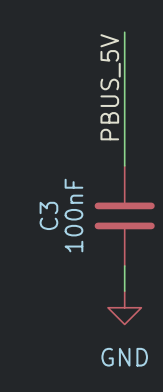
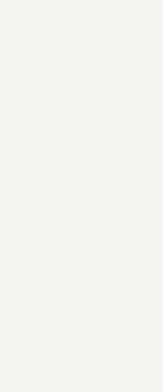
wire: (124, 32) (124, 165) -> none
label: PBUS_5V (110, 87) -> none
C3: 100nF (124, 215) -> none
wire: (124, 266) (124, 291) -> none
power symbol: GND (124, 307) -> none

